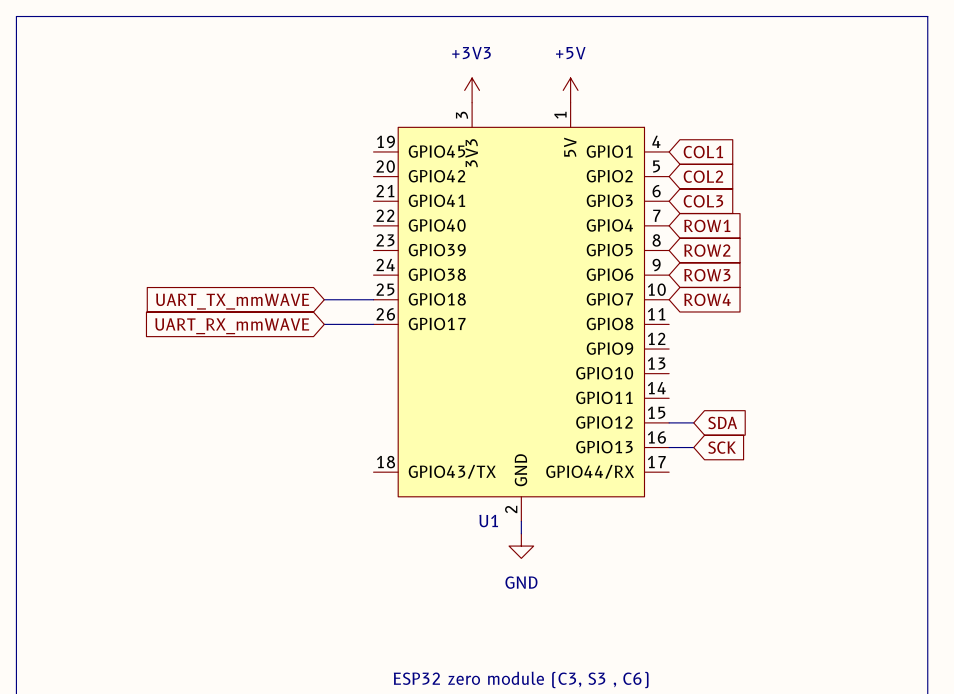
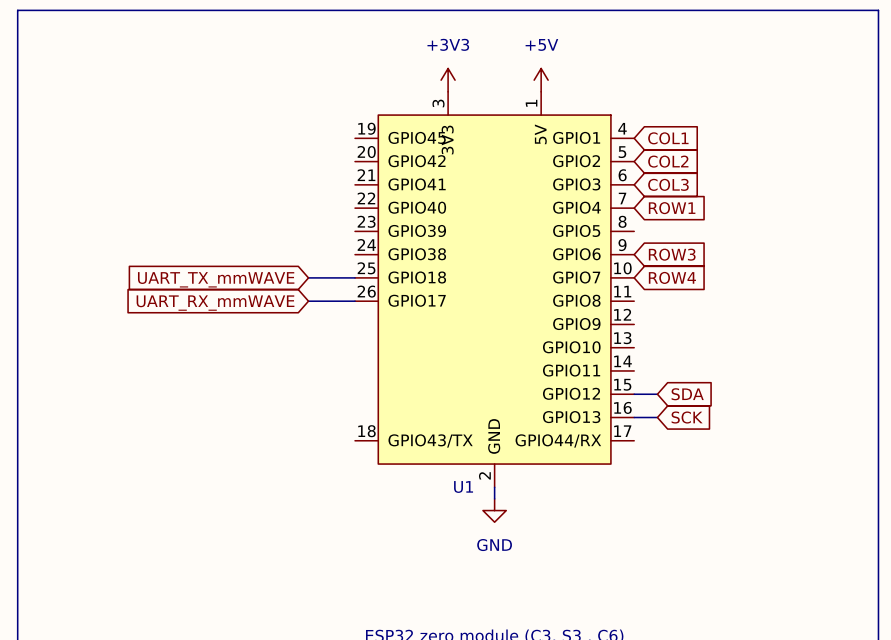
global label: ROW2 (707, 250) -> none

